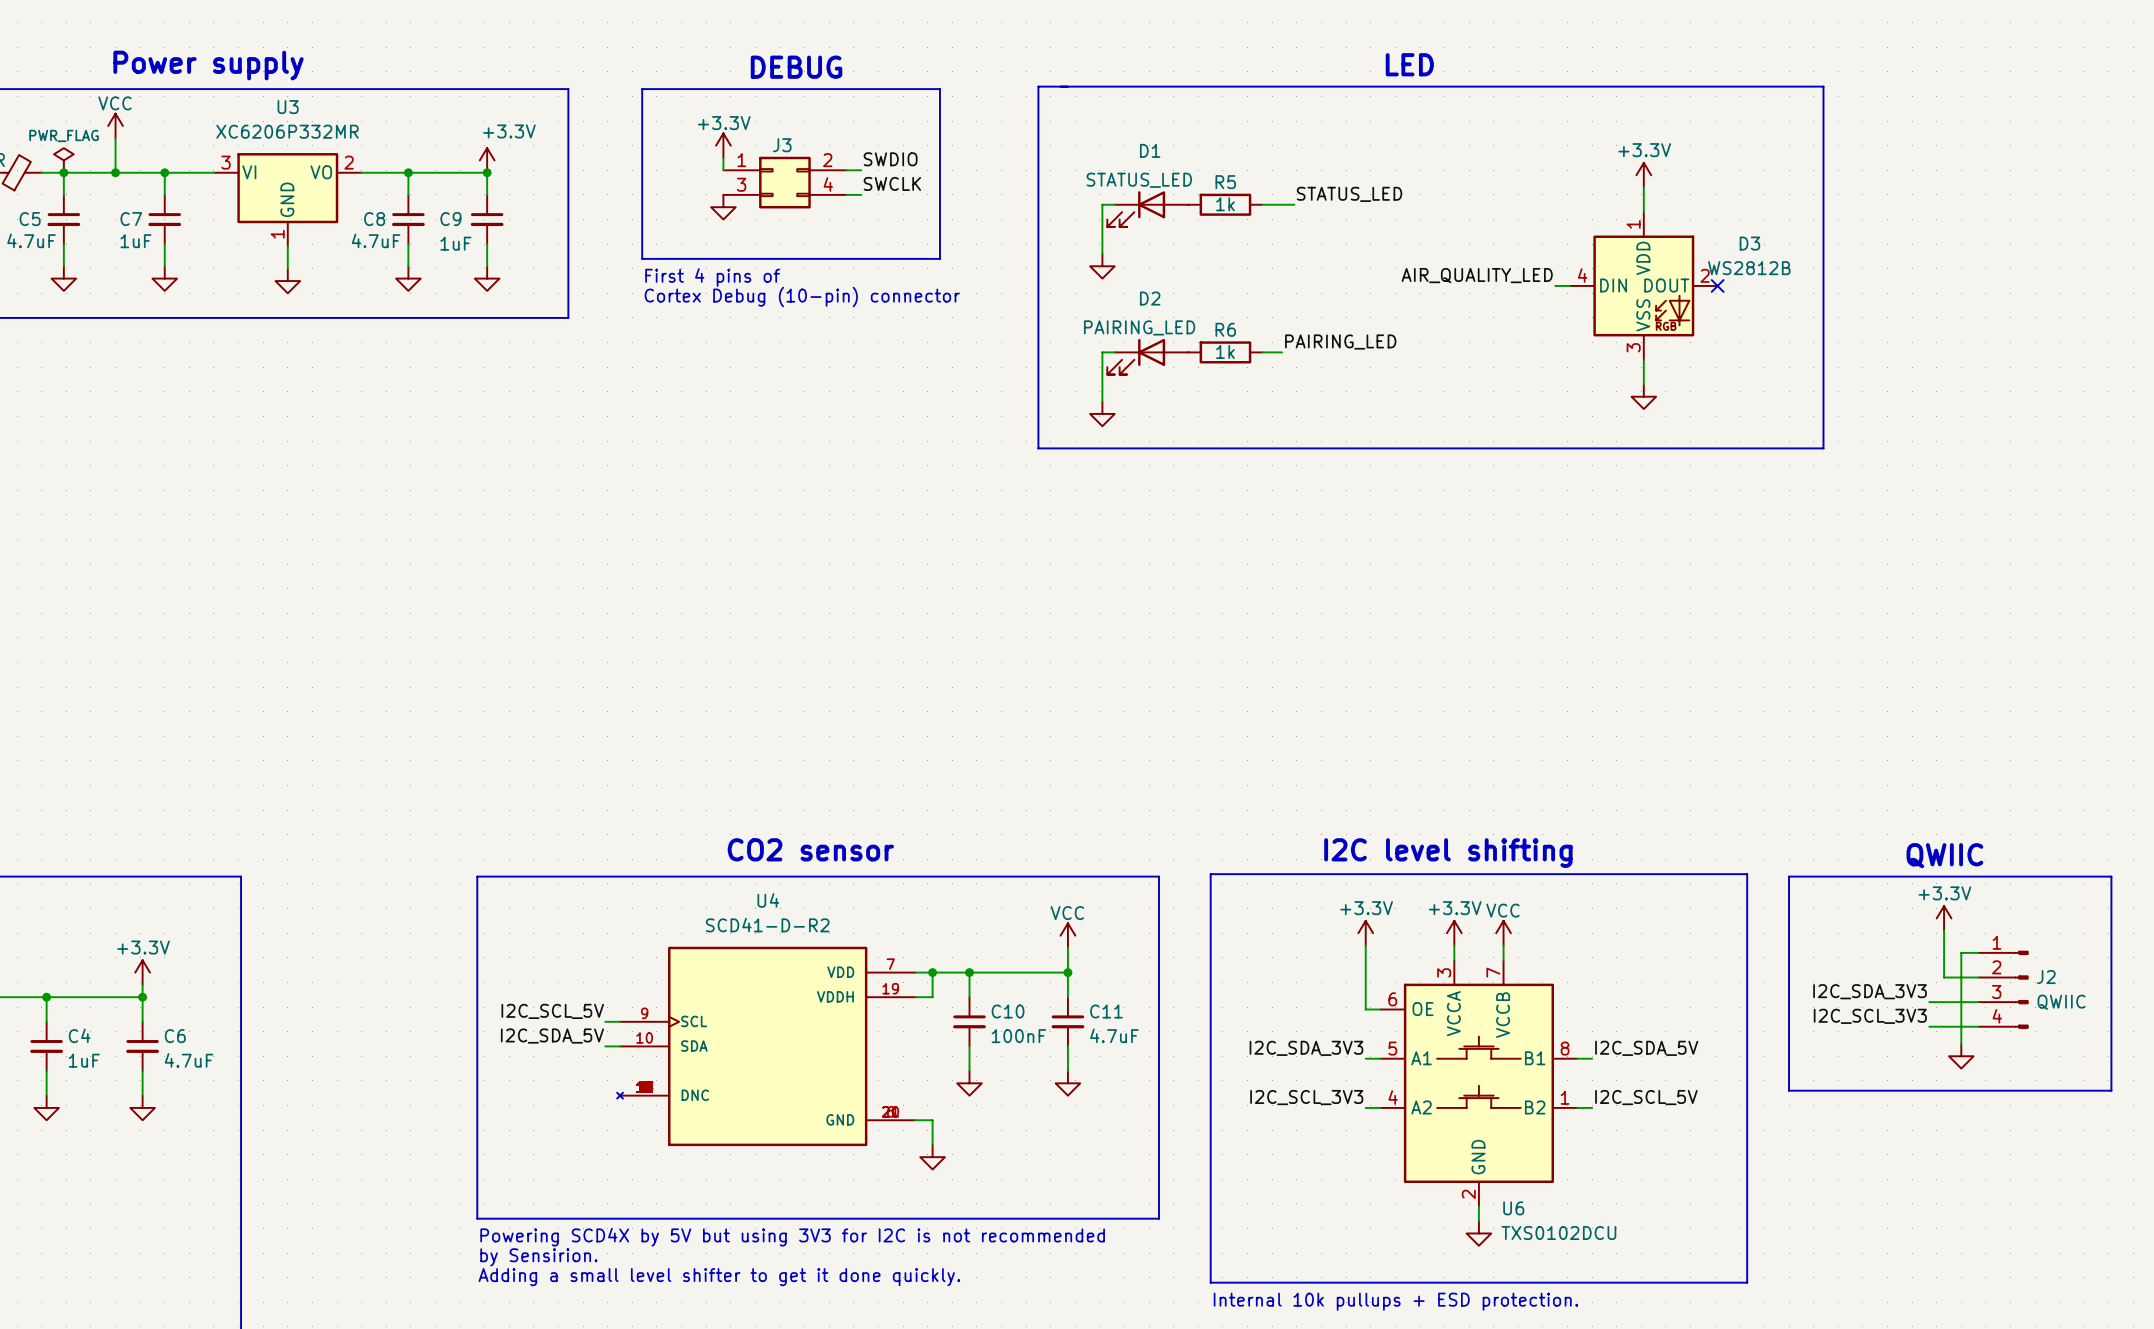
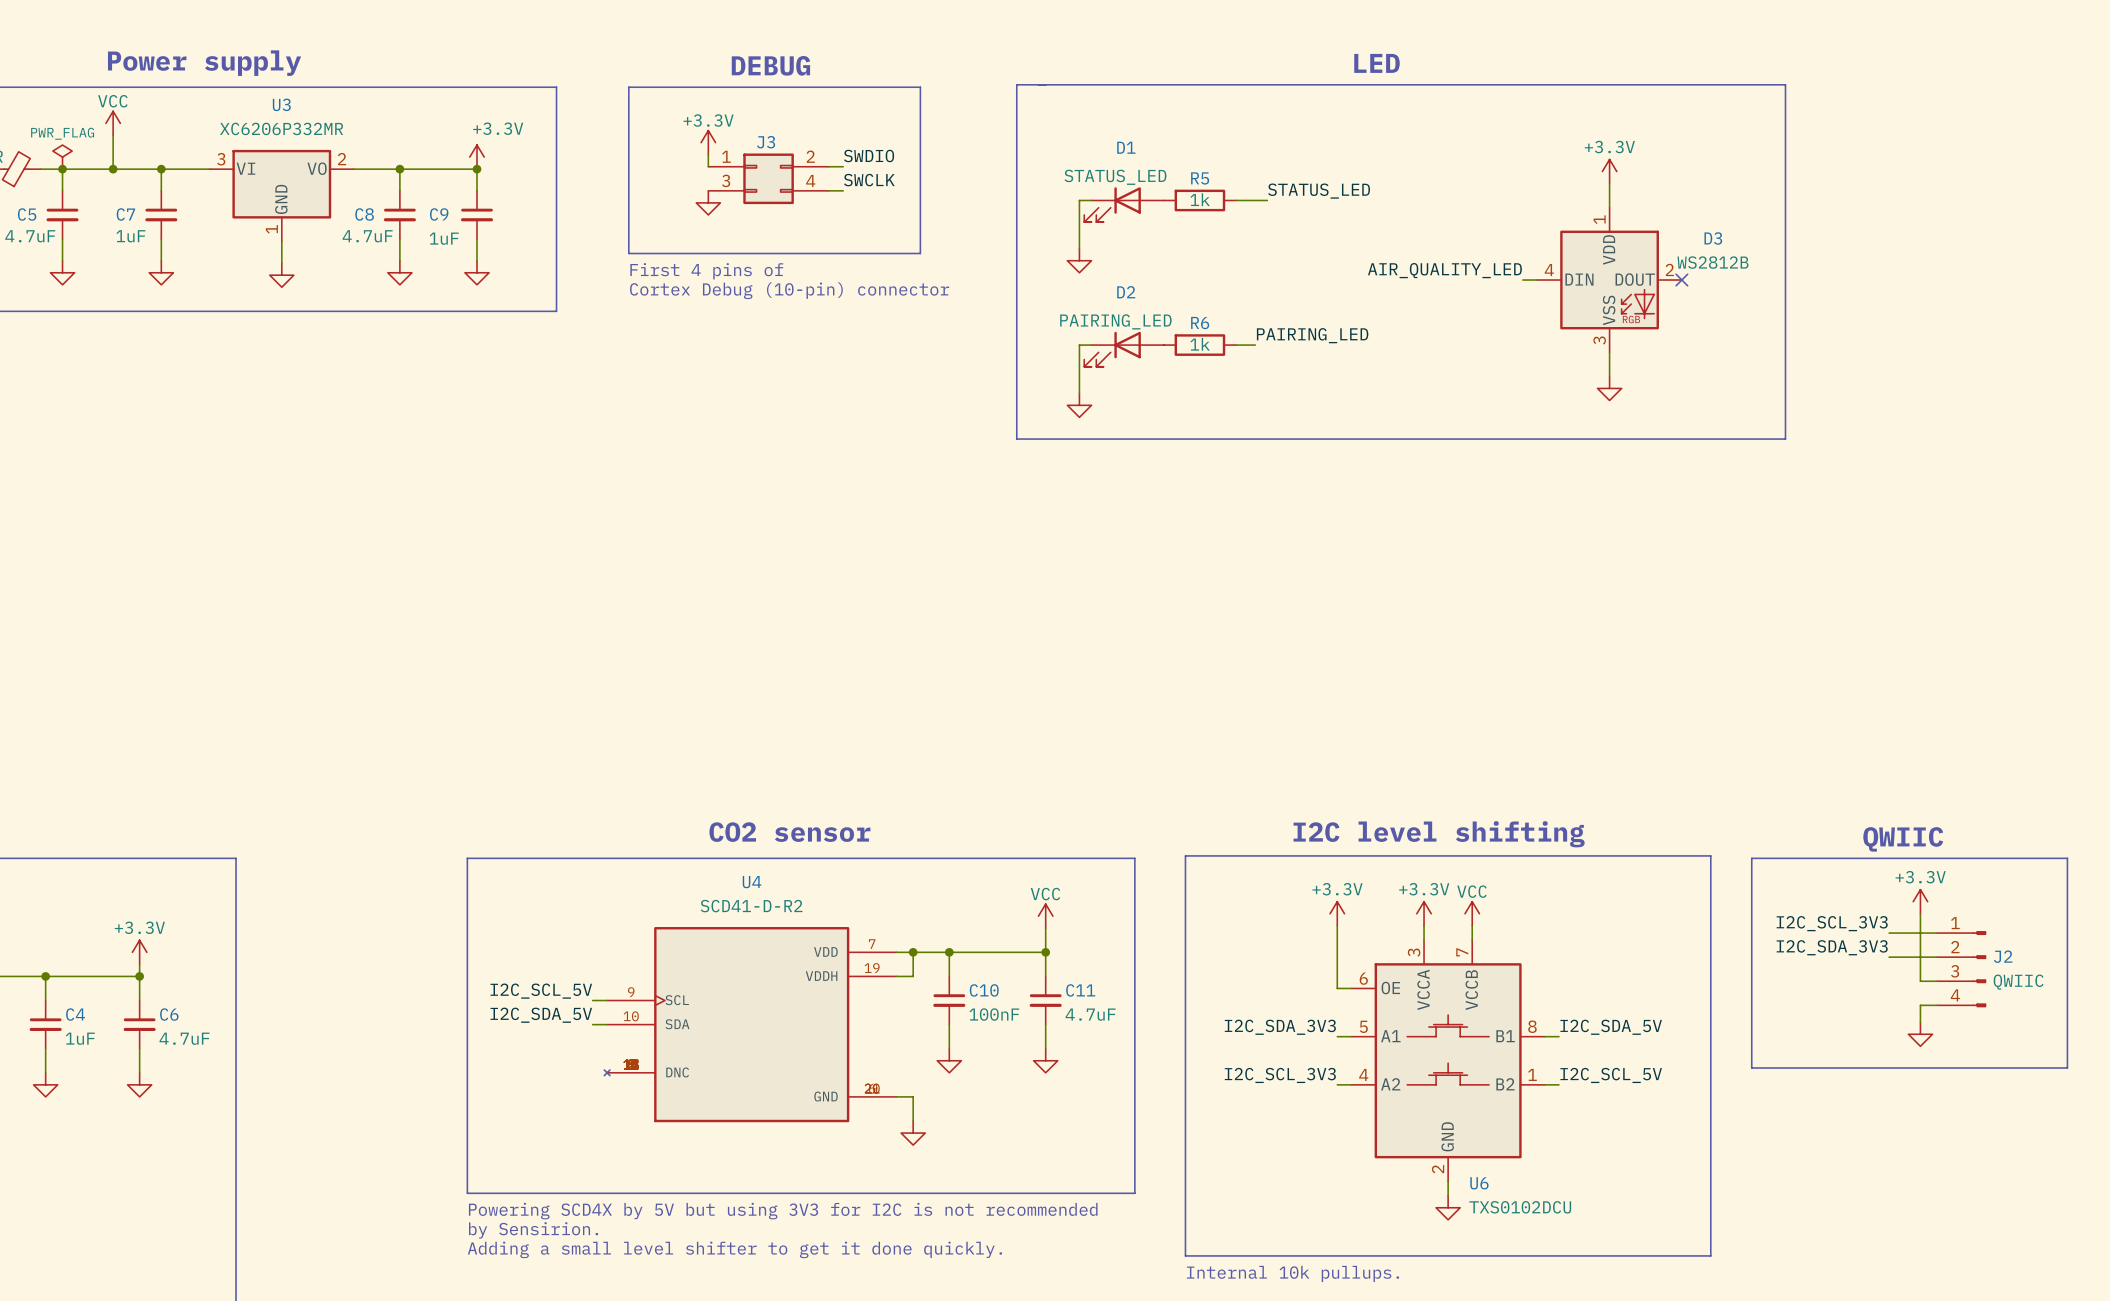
power symbol position: +3.3V (1944, 918) -> +3.3V (1920, 901)
wire: (1944, 930) (1944, 977) -> (1889, 957) (1903, 957)
wire: none -> (1920, 913) (1920, 933) (1889, 933)
label position: I2C_SDA_3V3 (1870, 991) -> I2C_SDA_3V3 (1832, 947)
wire: (1929, 1002) (1961, 1002) (1961, 1026) (1929, 1026) -> none
label position: I2C_SCL_3V3 (1870, 1016) -> I2C_SCL_3V3 (1832, 923)
text: Internal 10k pullups + ESD protection. (1395, 1301) -> Internal 10k pullups. (1292, 1273)

